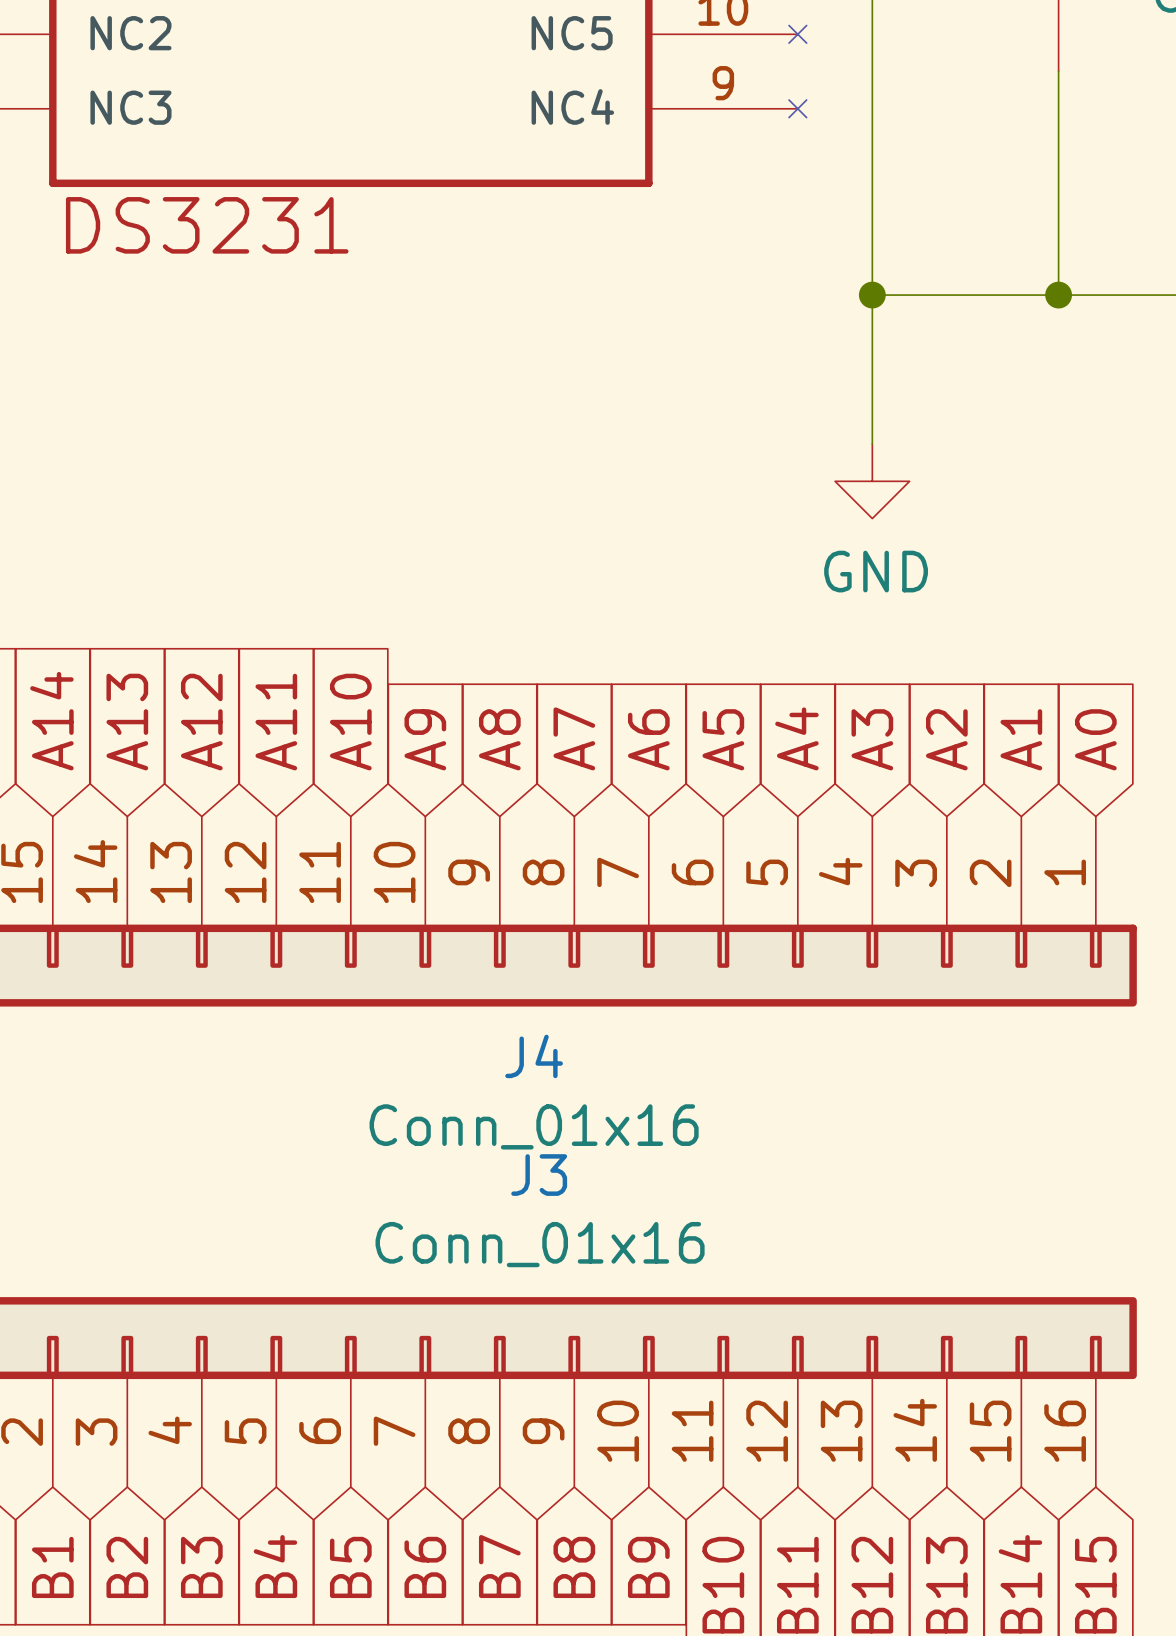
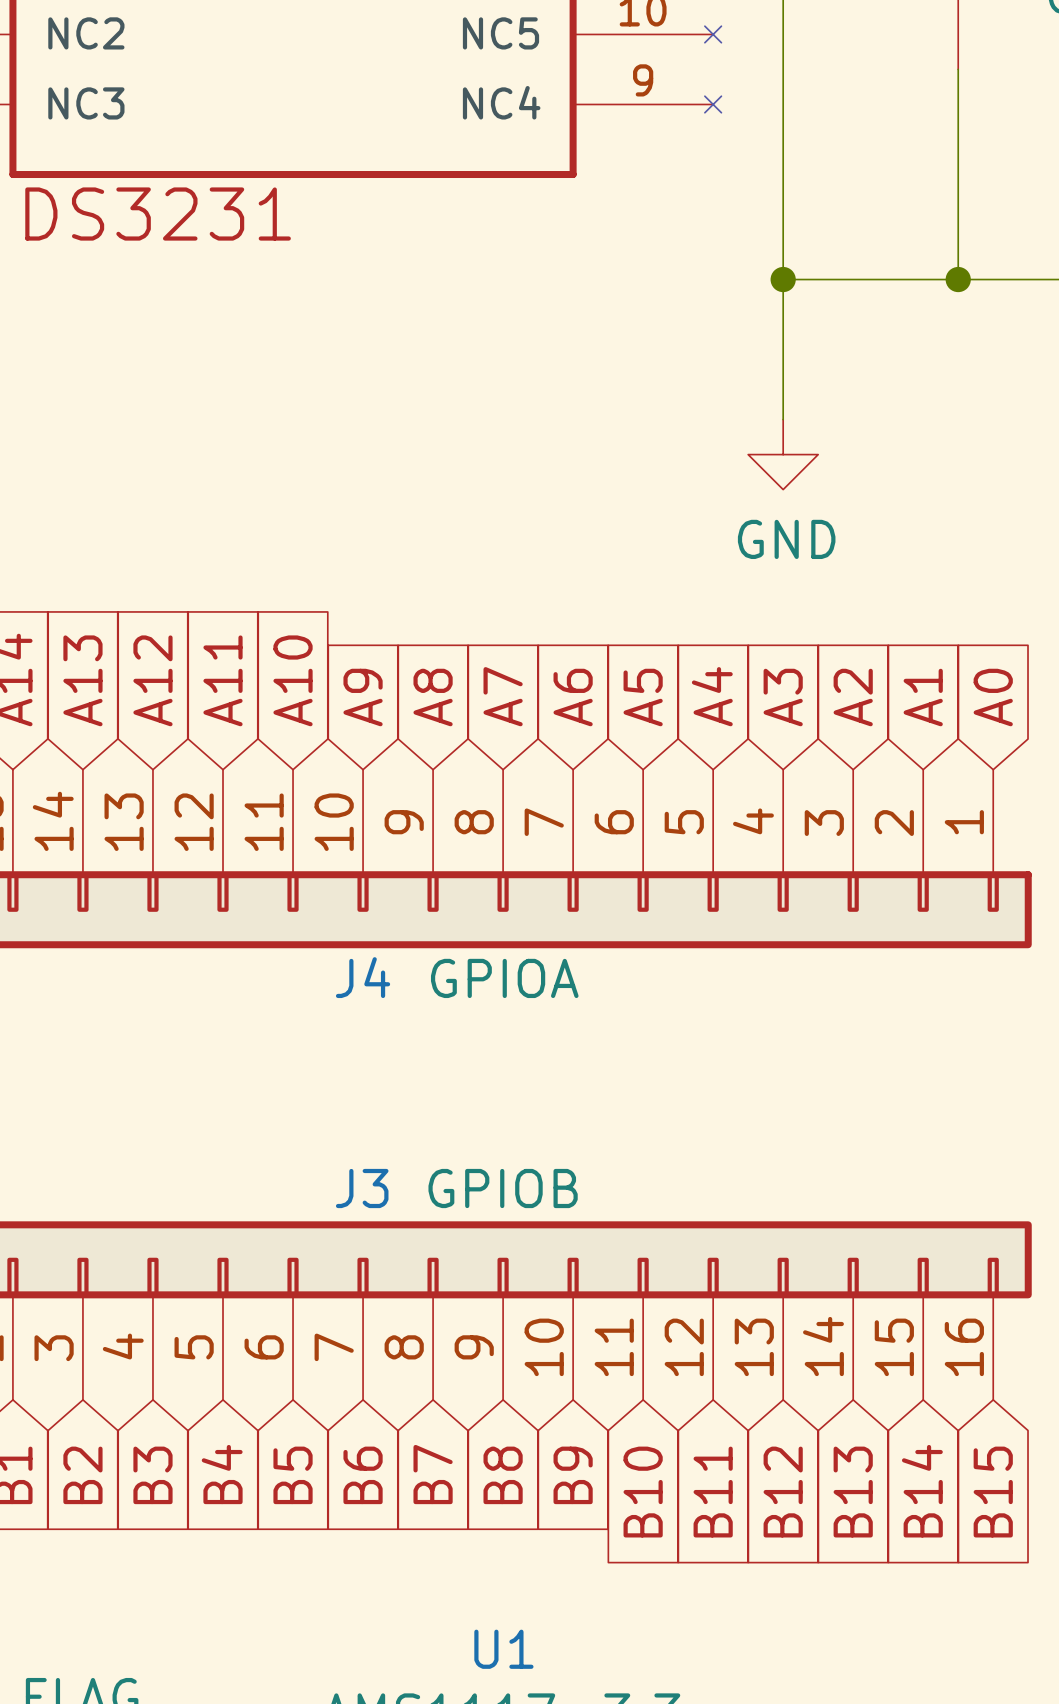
J4 name position: J4 (534, 1056) -> J4 (363, 977)
J4 value: Conn_01x16 (534, 1126) -> GPIOA (504, 978)
J3 name position: J3 (539, 1175) -> J3 (362, 1188)
J3 value: Conn_01x16 (540, 1244) -> GPIOB (503, 1188)

